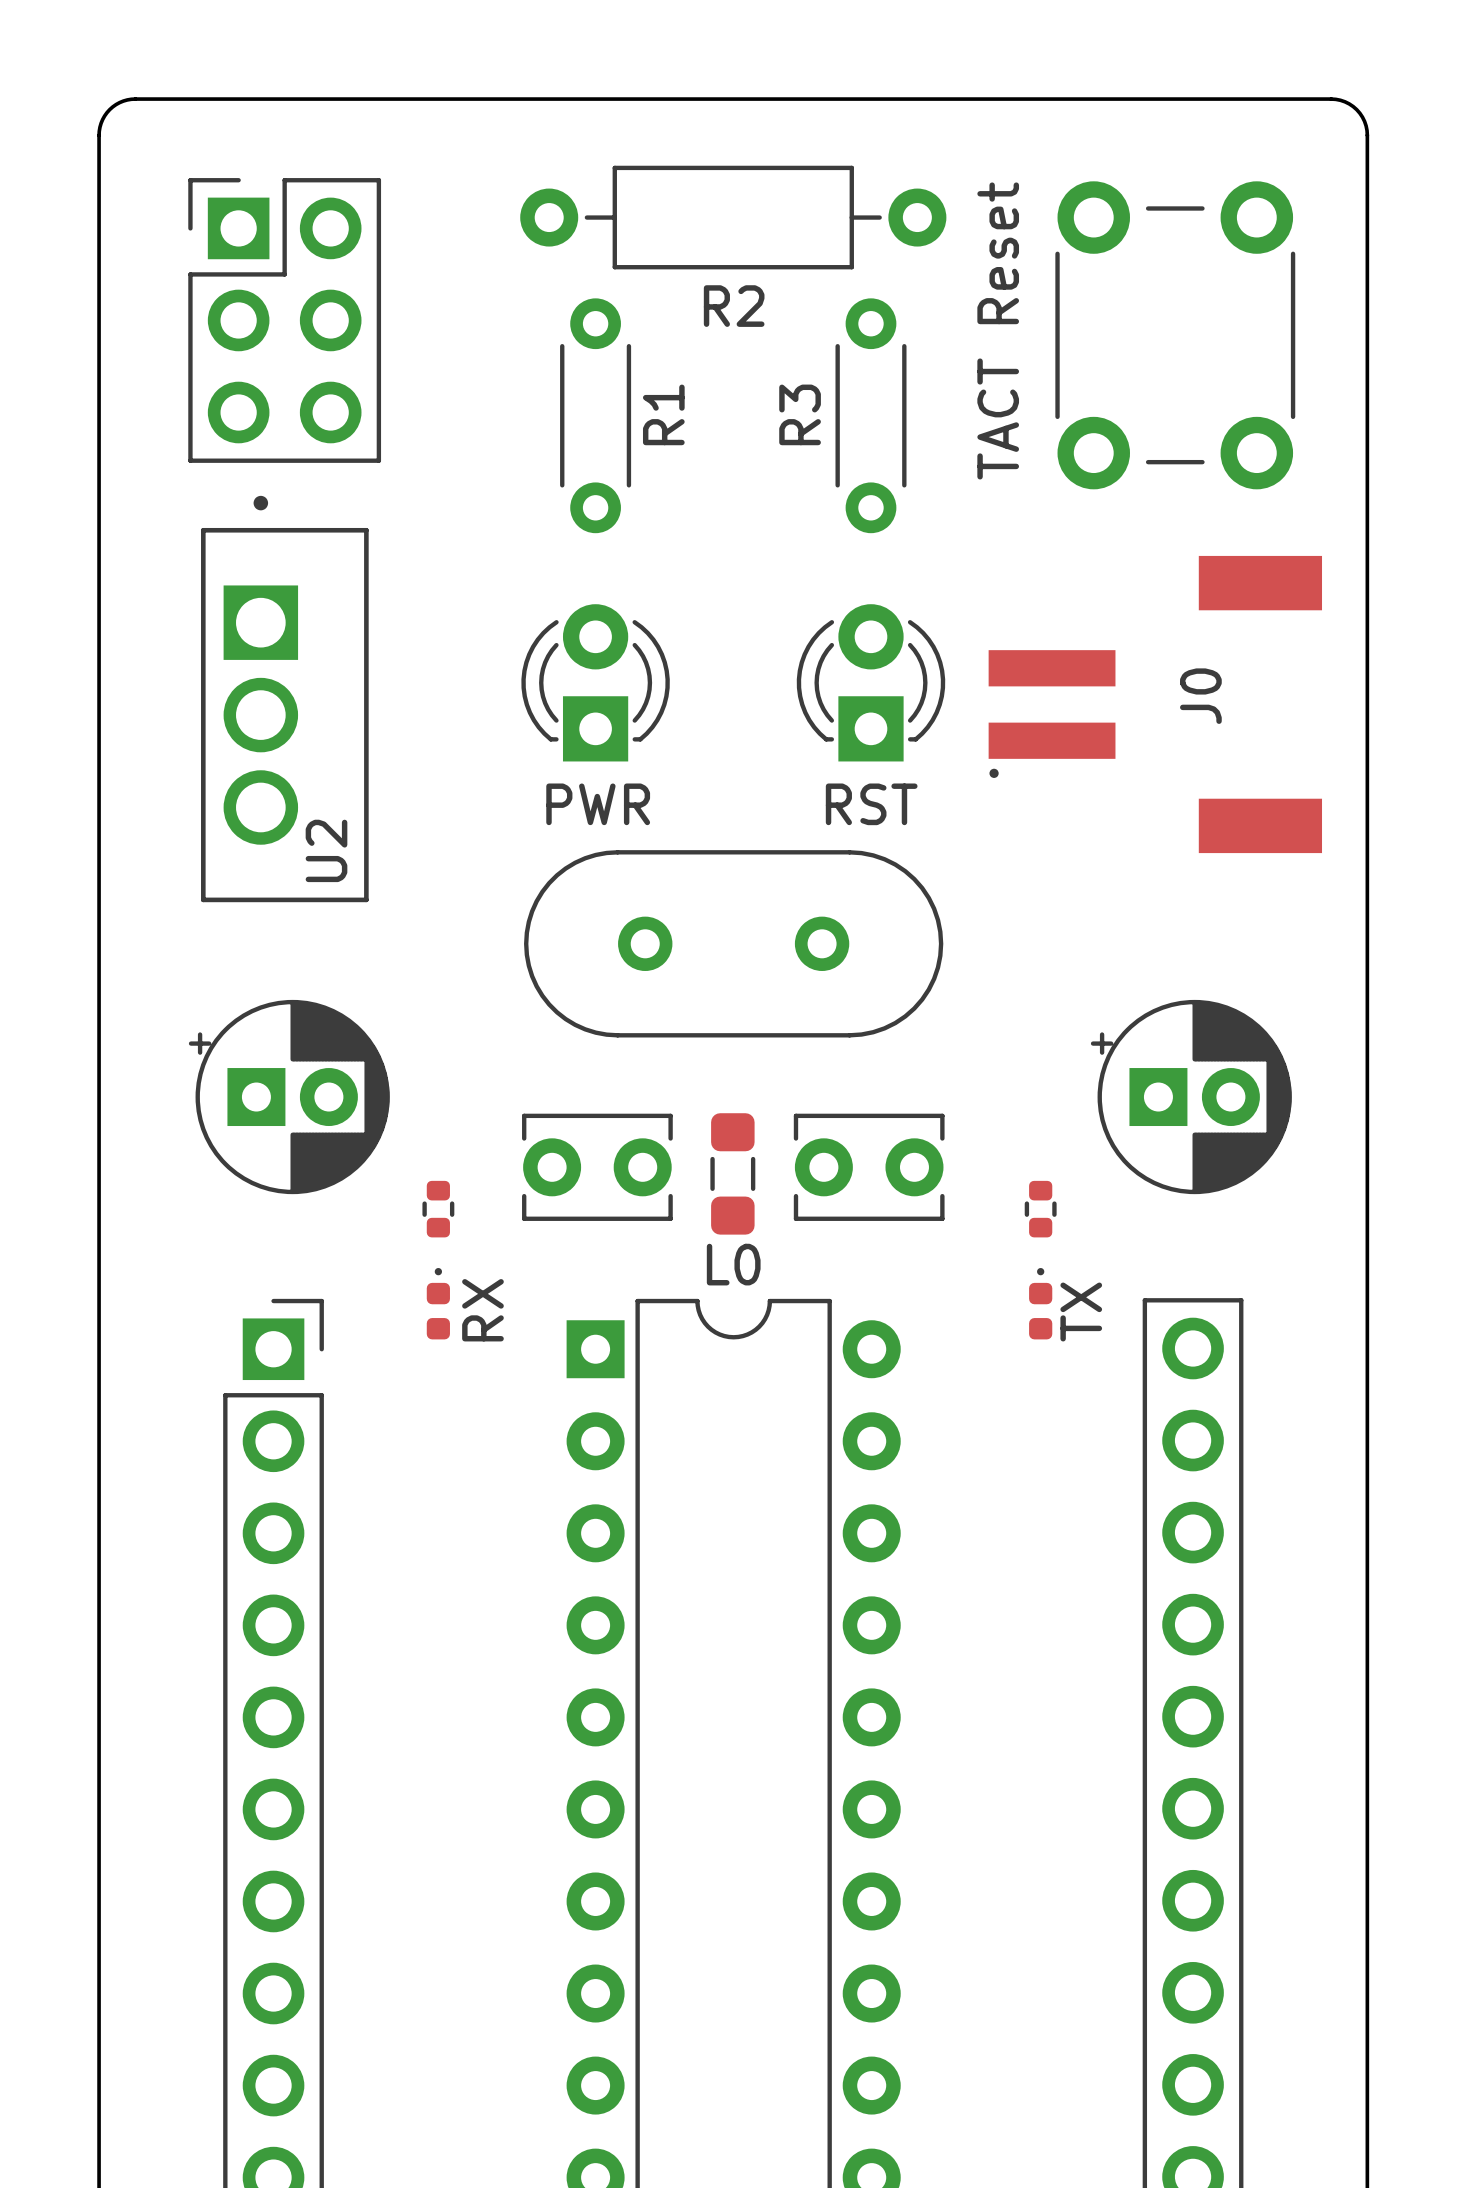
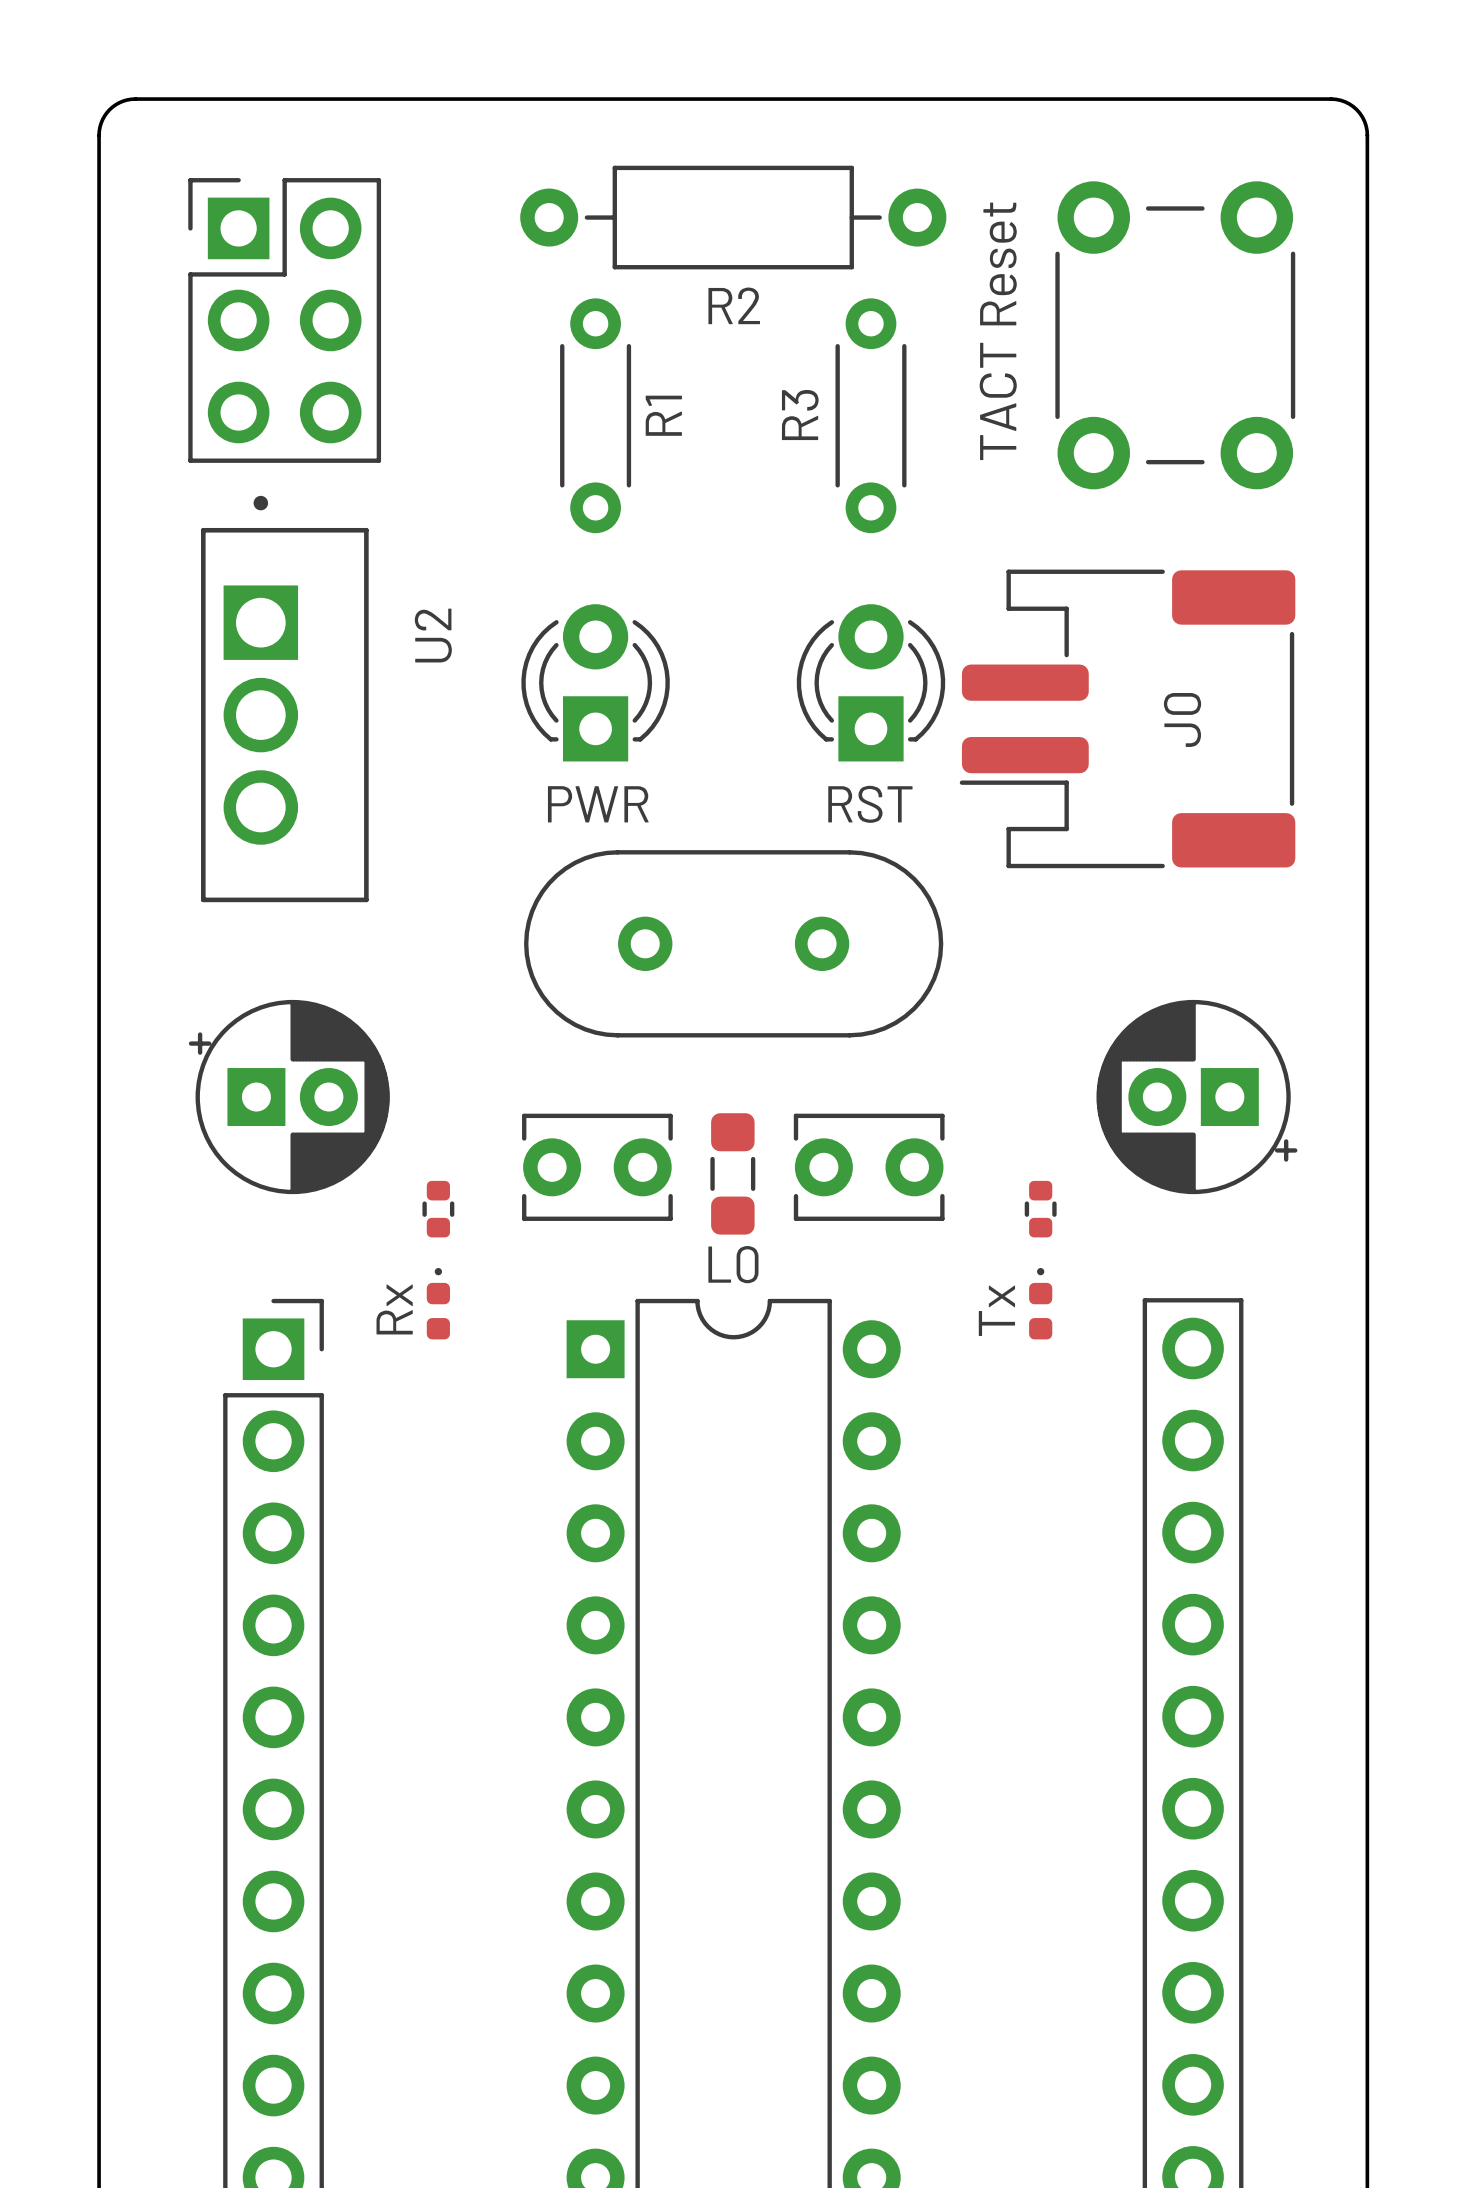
J0 footprint: [988, 555, 1323, 854] -> [959, 569, 1296, 869]
U2 name position: U2 (326, 850) -> U2 (433, 635)
part rotation: 0° (1191, 1097) -> 180° (1196, 1097)
part value: RX (482, 1310) -> Rx (394, 1309)
part value: TX (1081, 1312) -> Tx (996, 1310)

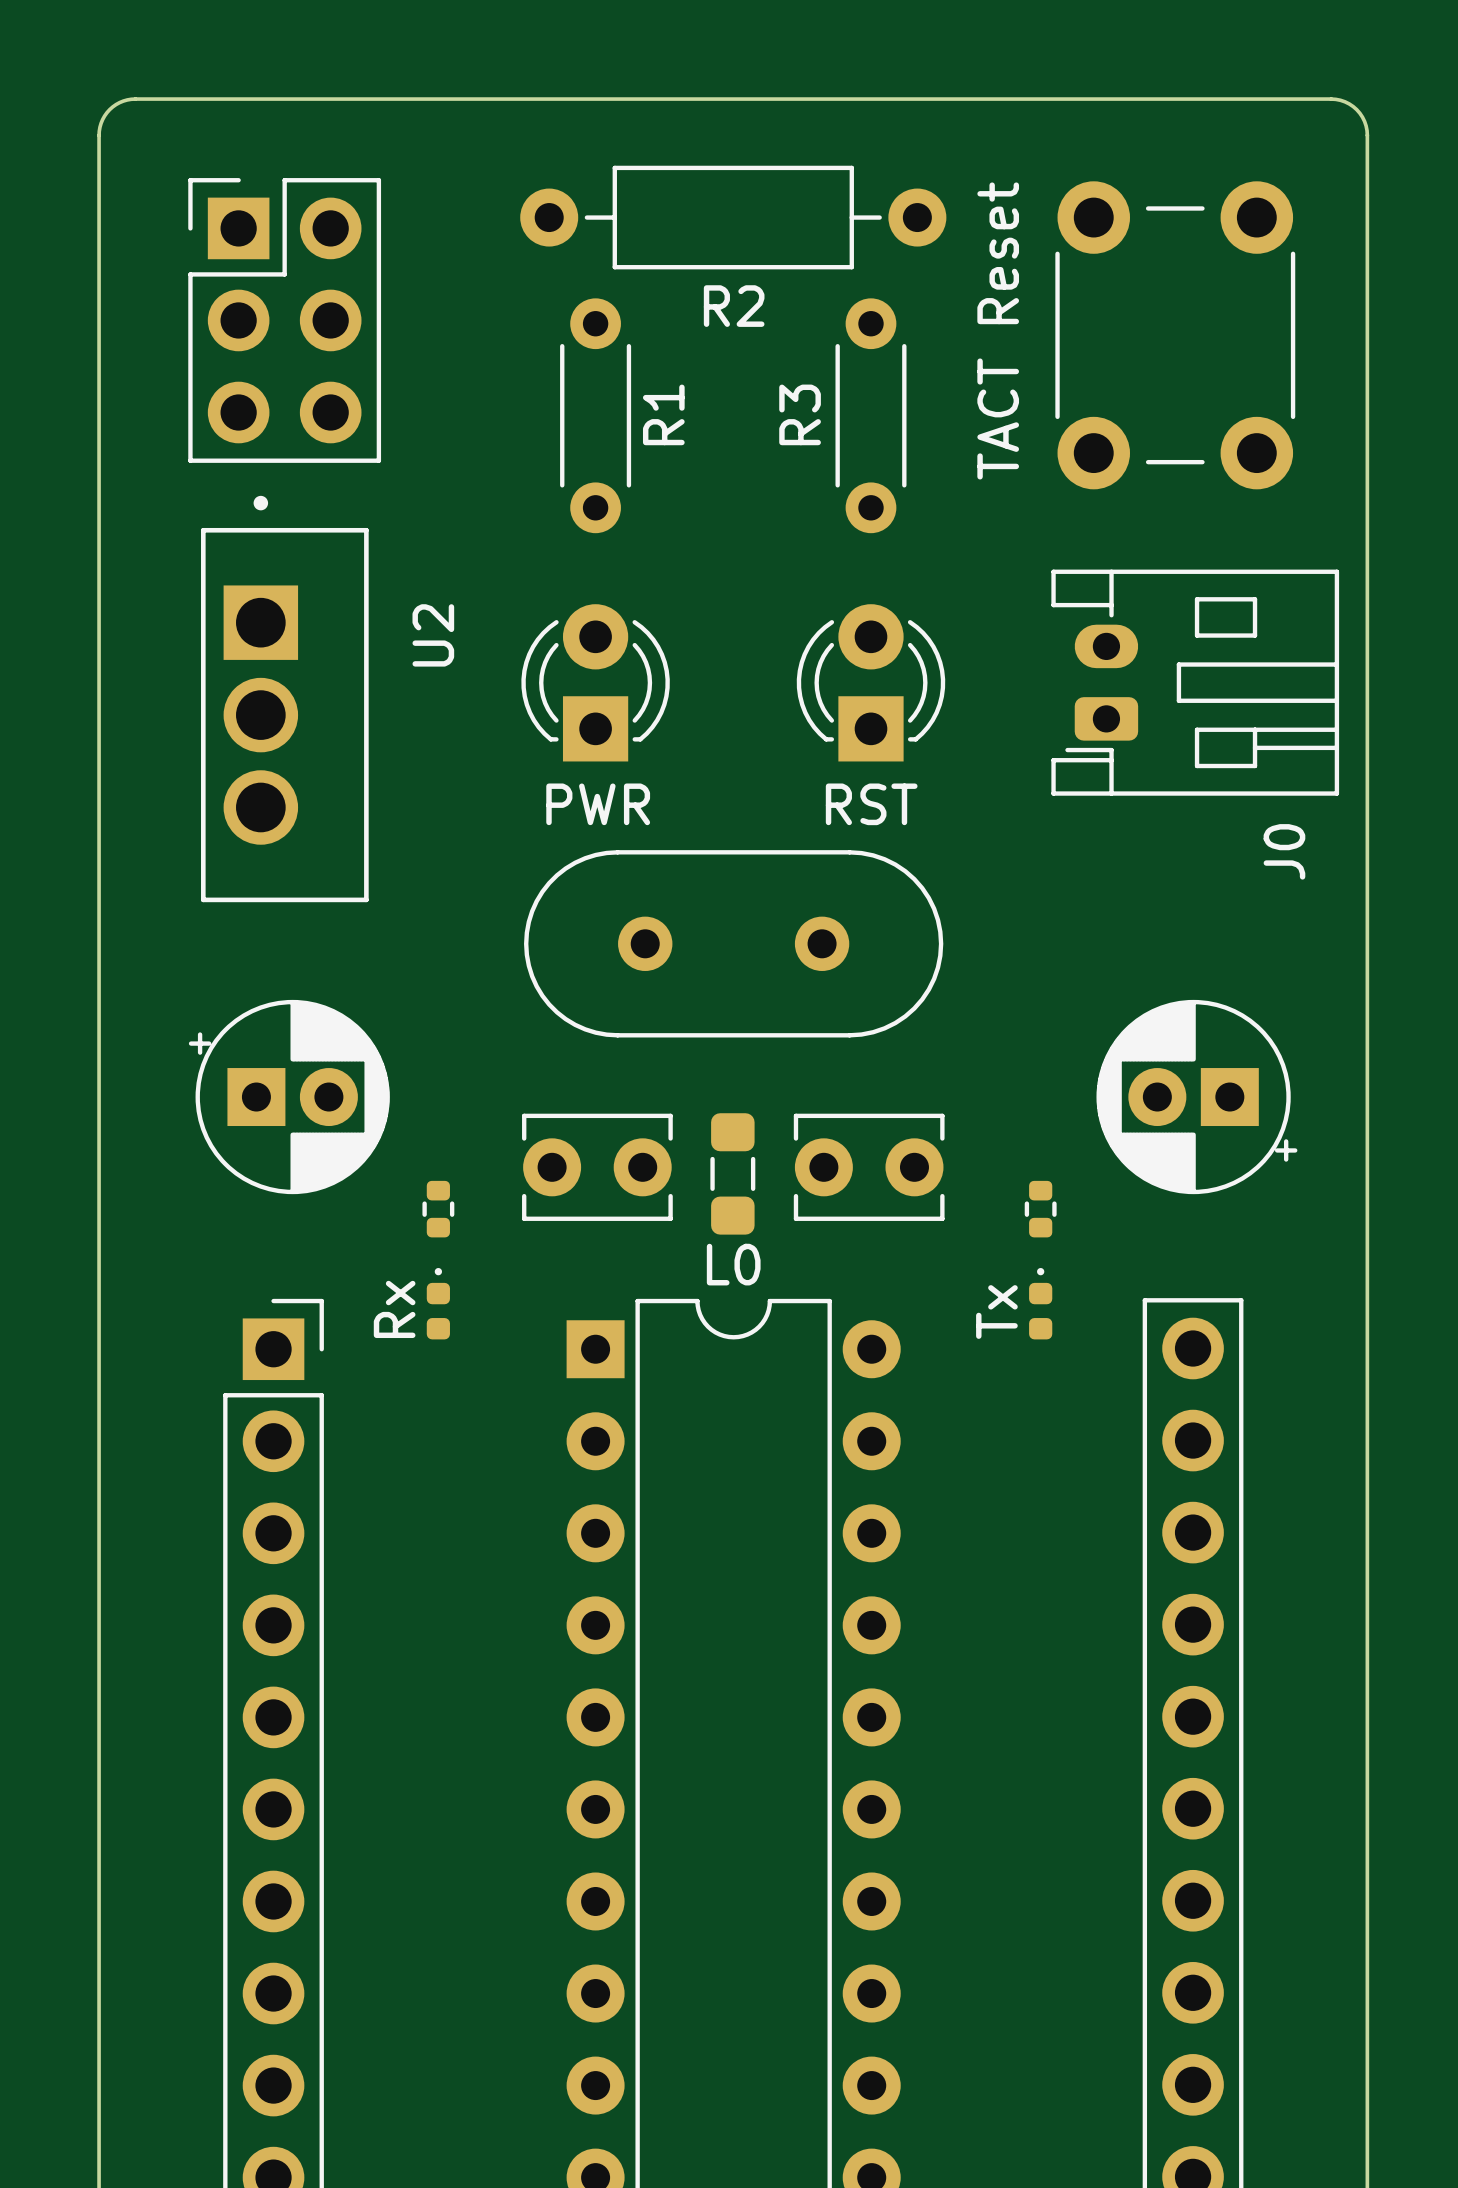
J0 footprint: [959, 569, 1296, 869] -> [1051, 569, 1340, 796]
J0 name position: J0 (1182, 719) -> J0 (1284, 851)

